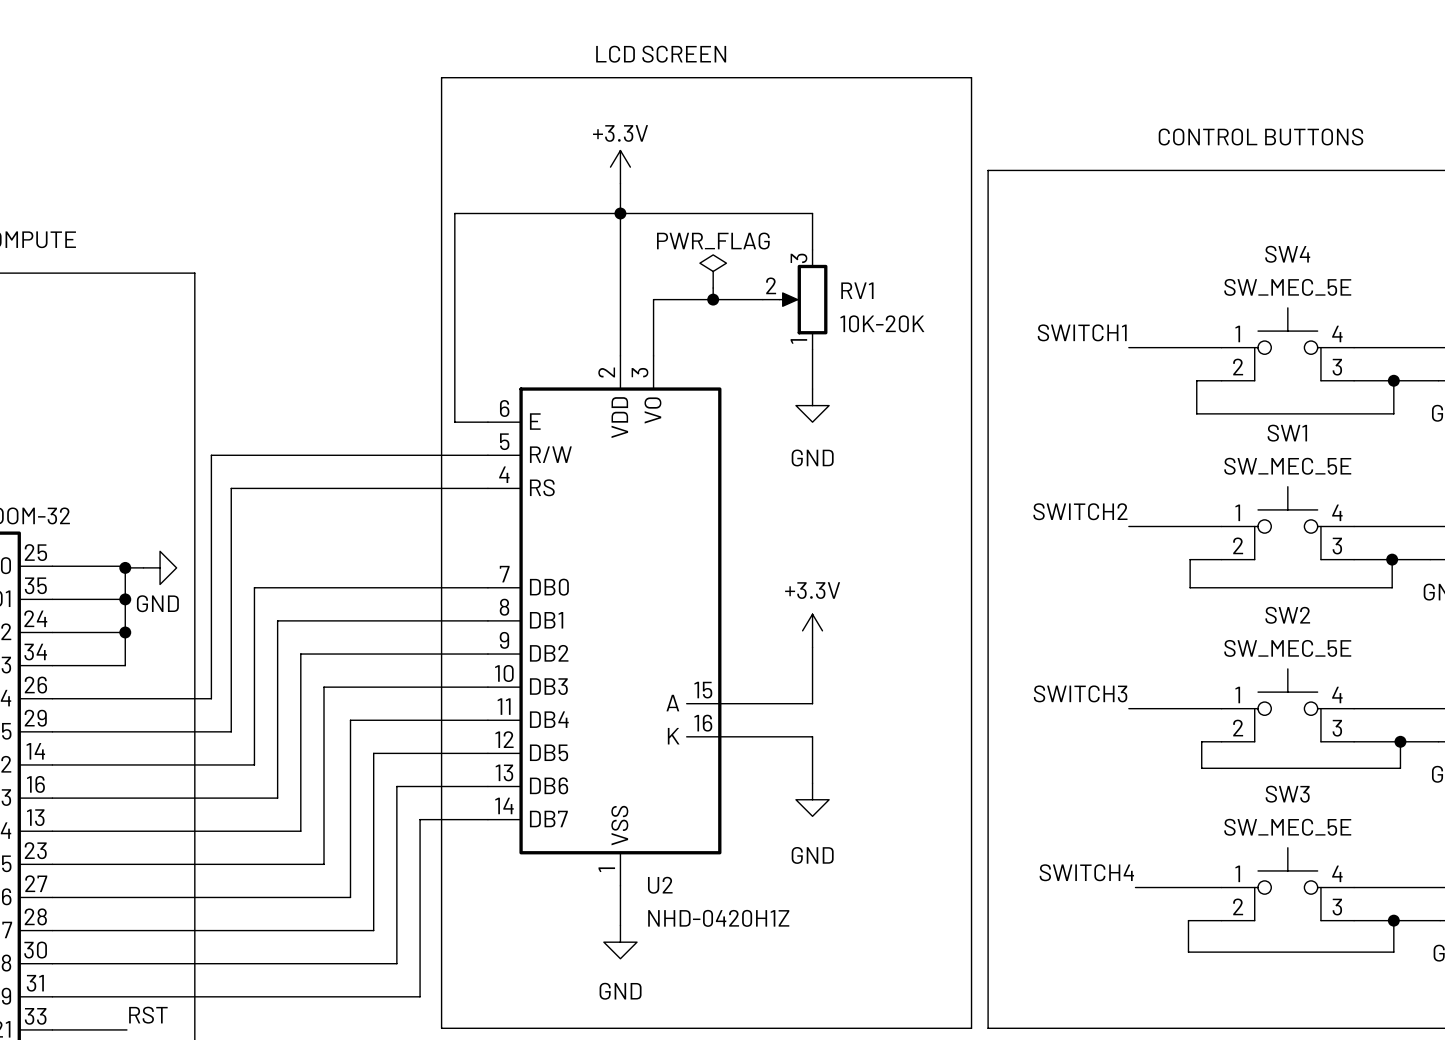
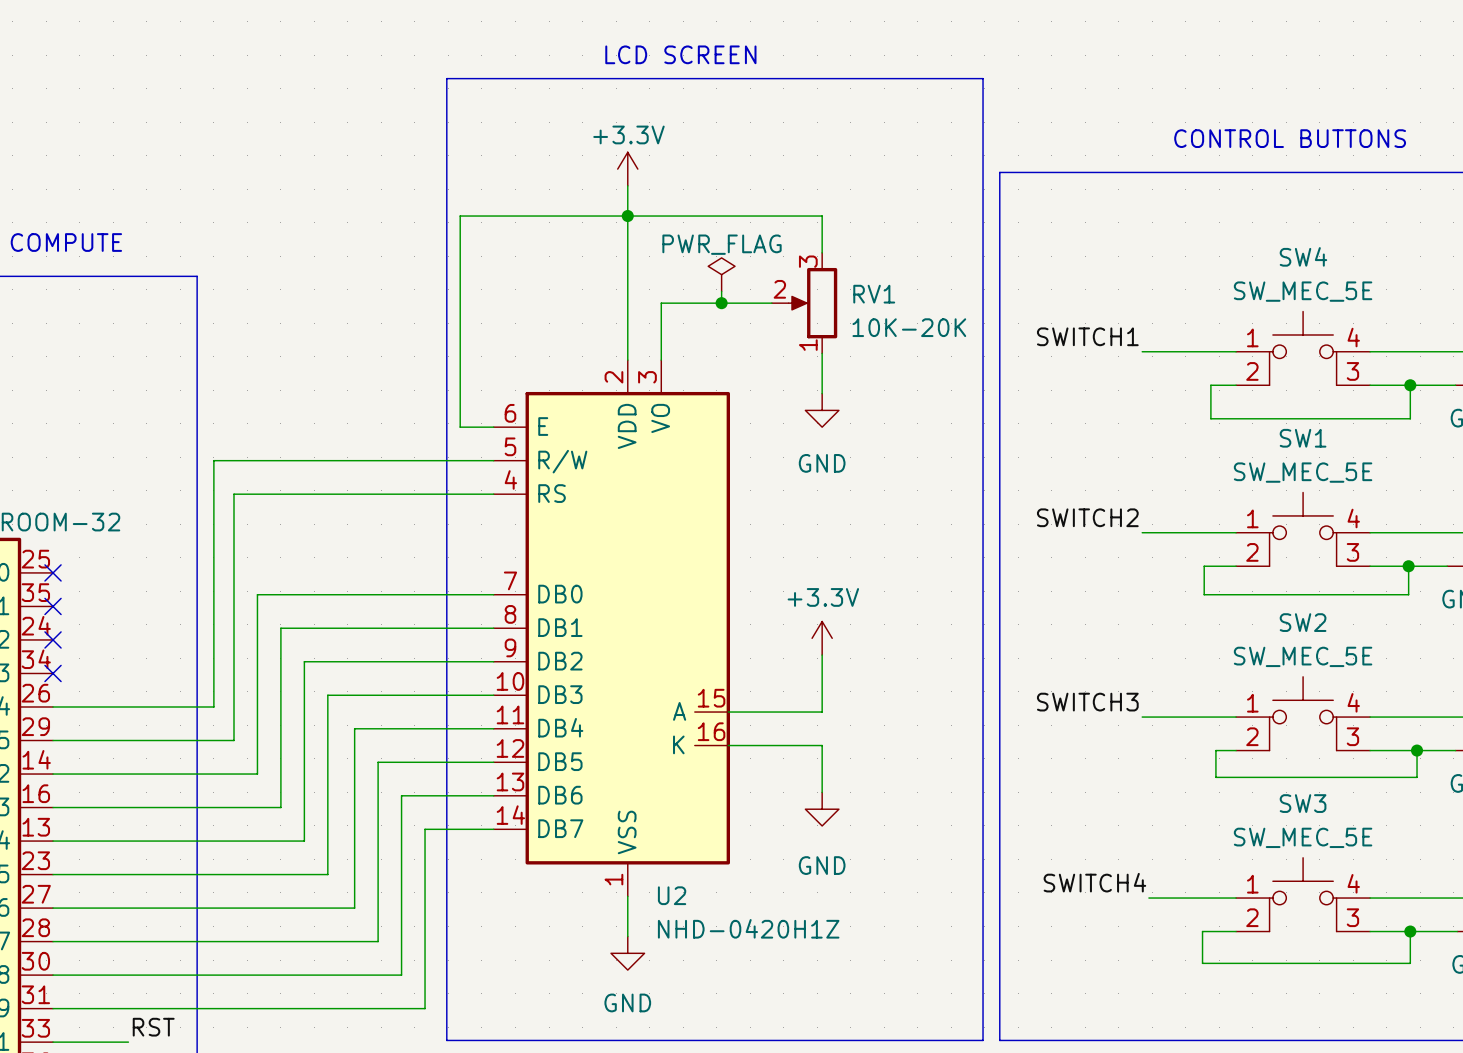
wire: (52, 566) (125, 566) (125, 665) (52, 665) -> none
no-connect mark: none -> (53, 572)
wire: (125, 567) (143, 567) -> none
junction: (125, 567) -> none
power symbol: GND (160, 567) -> none
wire: (52, 599) (125, 599) -> none
no-connect mark: none -> (53, 606)
junction: (125, 599) -> none
wire: (52, 632) (125, 632) -> none
no-connect mark: none -> (53, 639)
junction: (125, 632) -> none
no-connect mark: none -> (53, 673)

